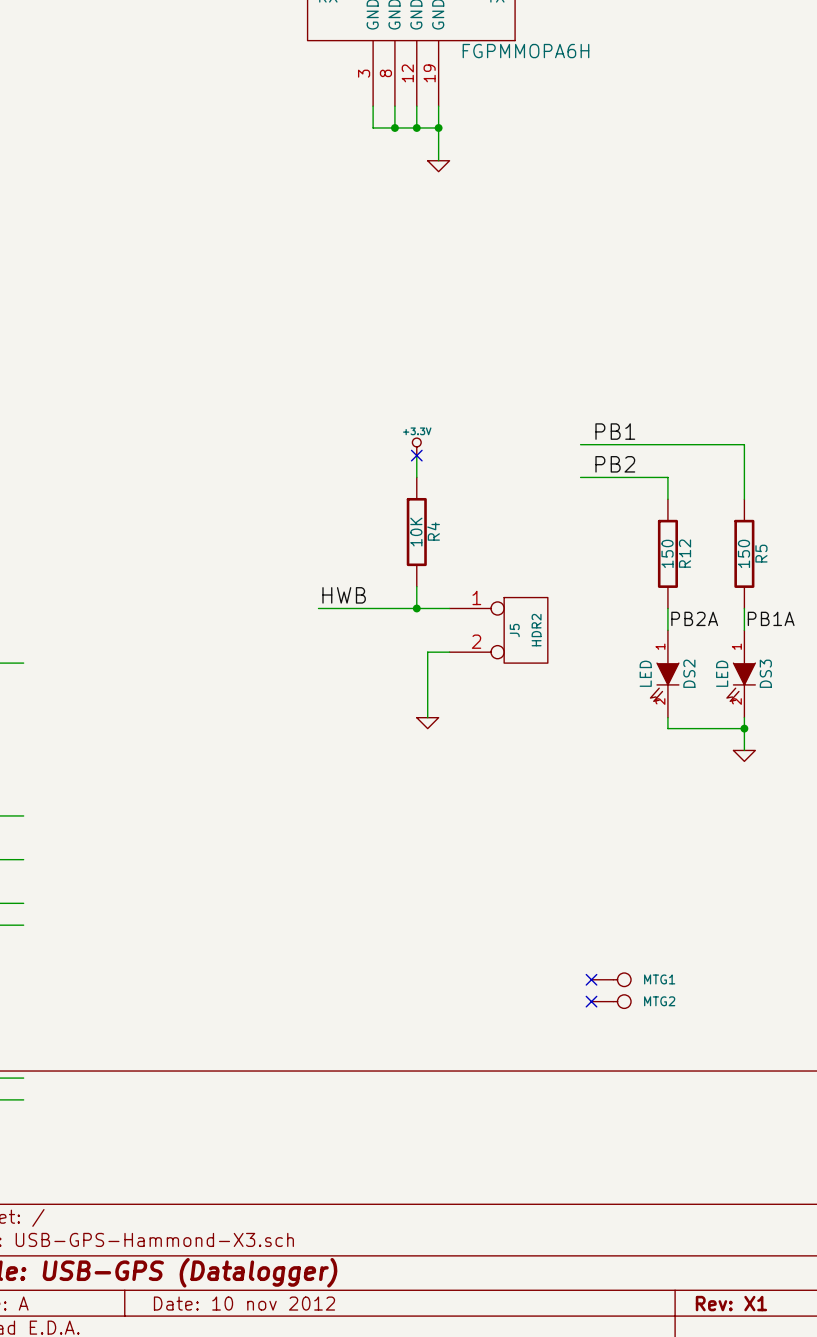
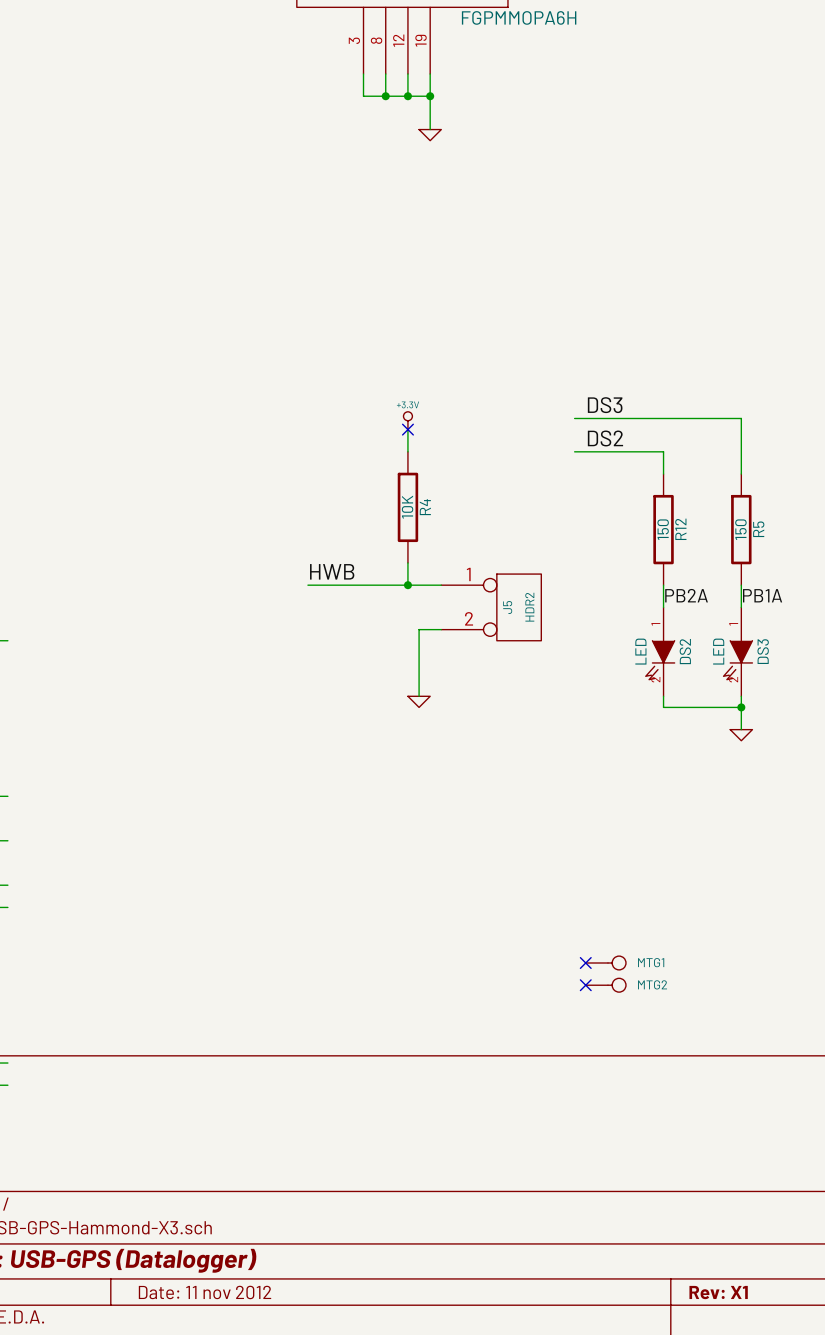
label: PB1 (615, 431) -> DS3 (605, 405)
label: PB2 (615, 464) -> DS2 (605, 438)
title block: Date: 10 nov 2012 (244, 1303) -> Date: 11 nov 2012 (205, 1292)

